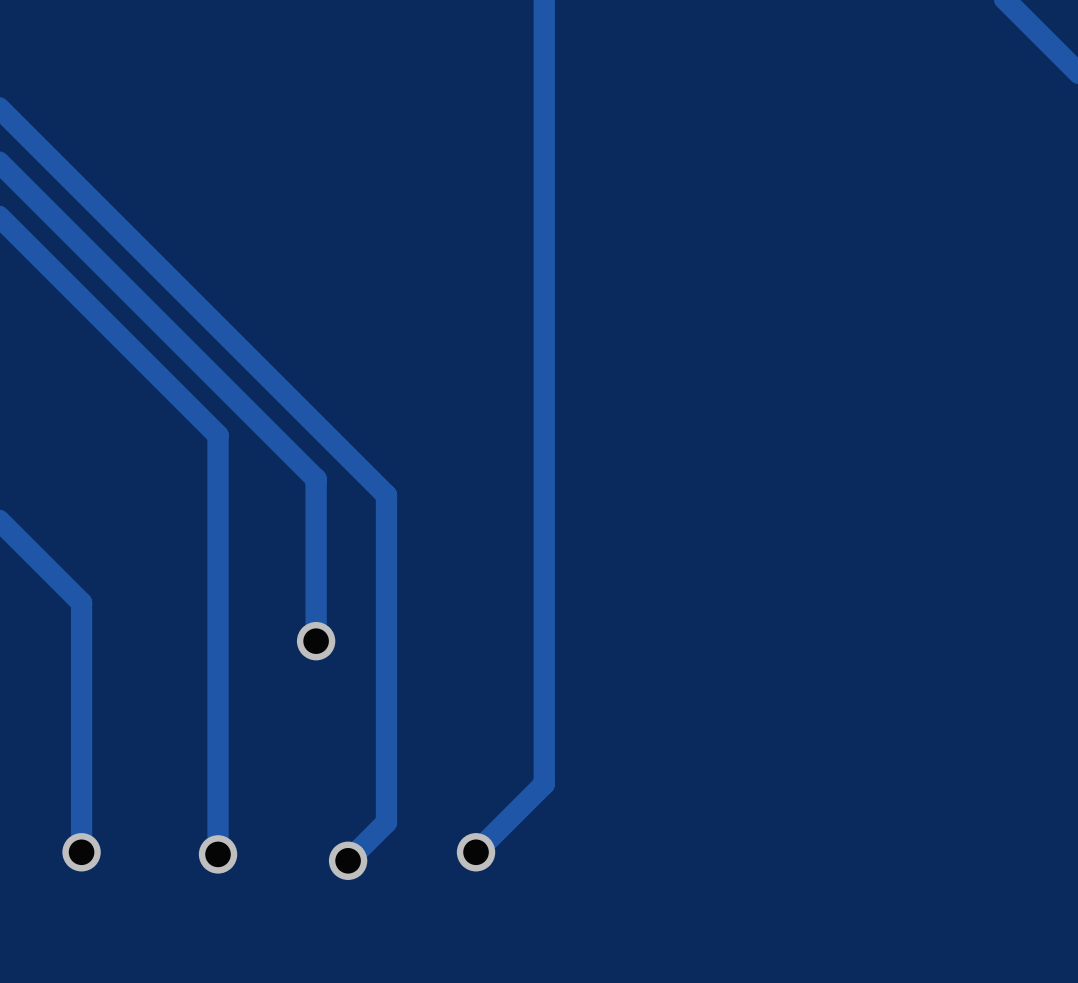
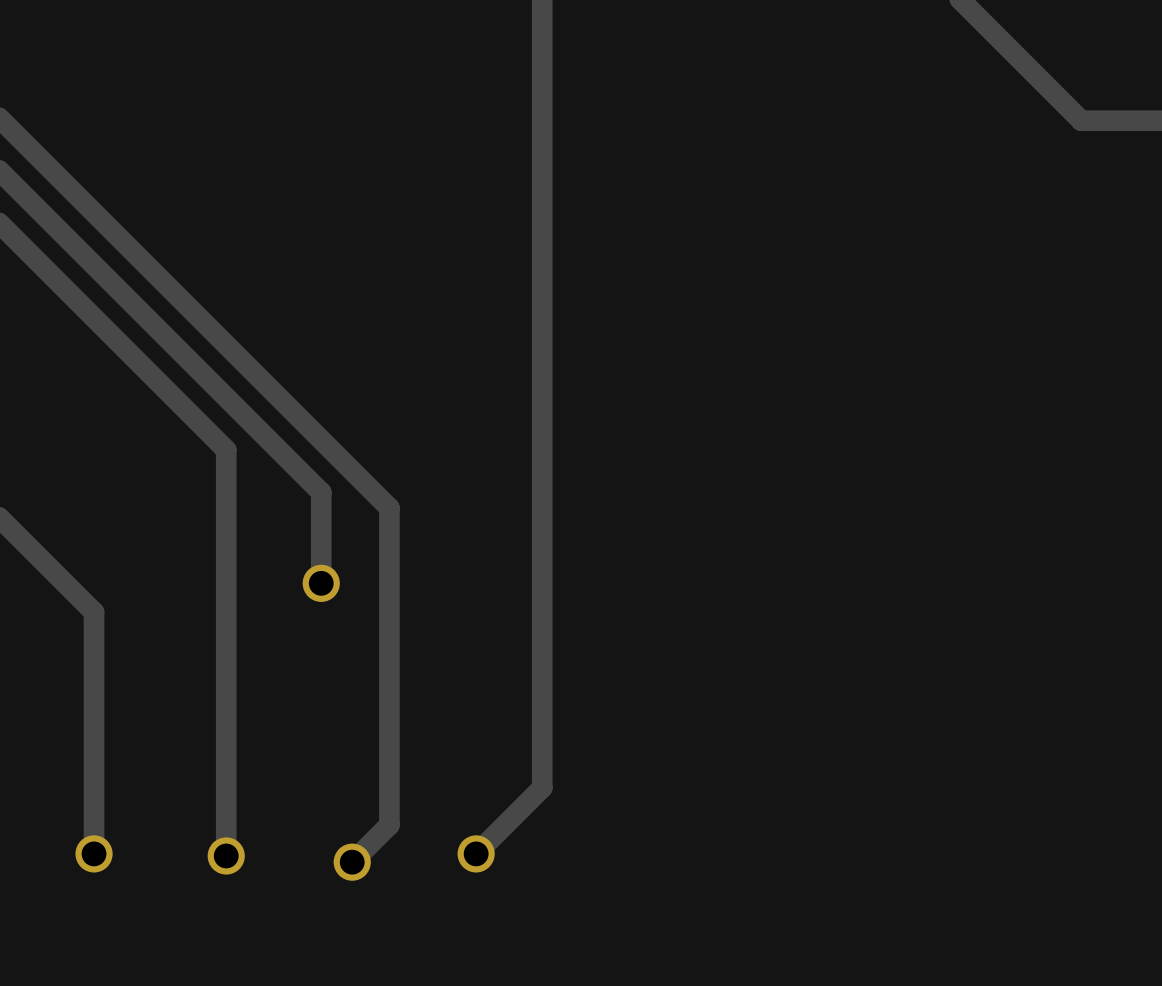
track: (316, 572) (316, 641) -> none
via position: (316, 641) -> (321, 583)

